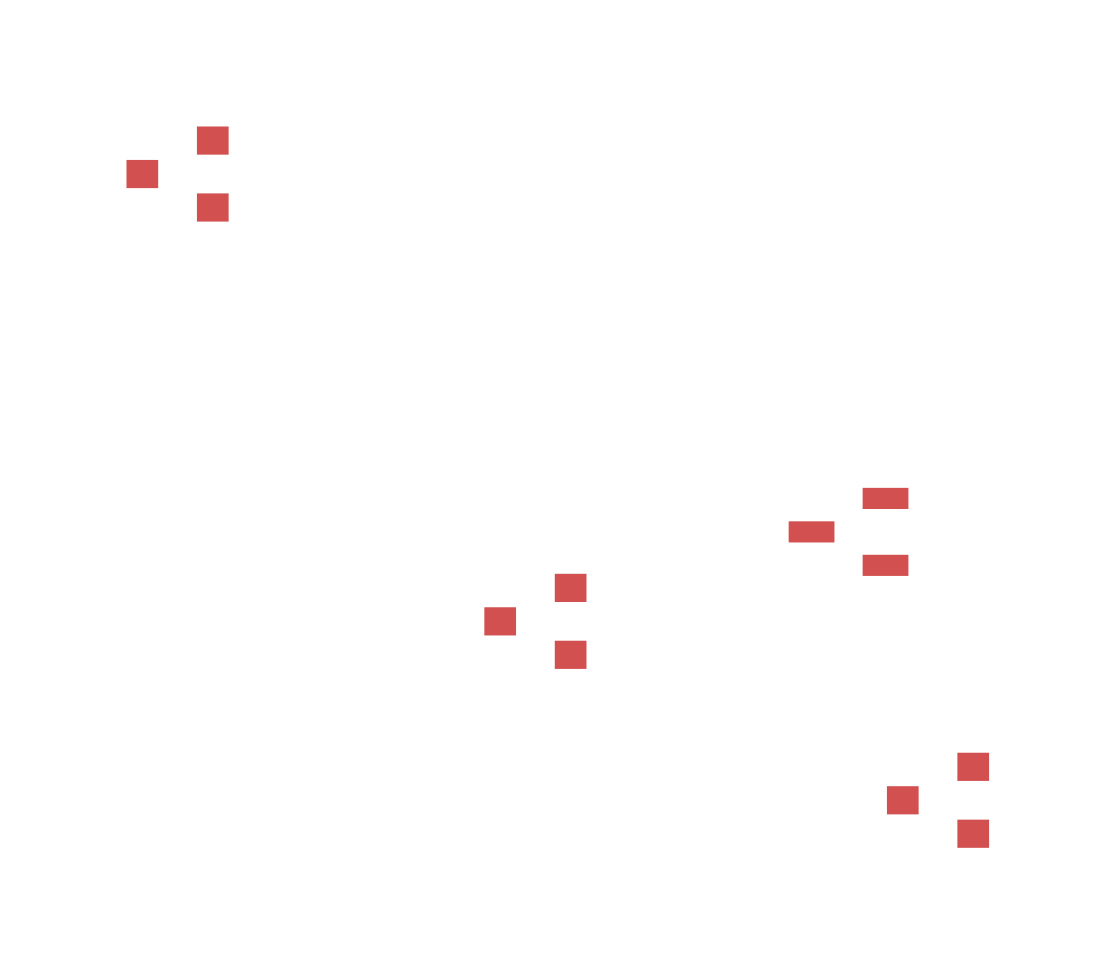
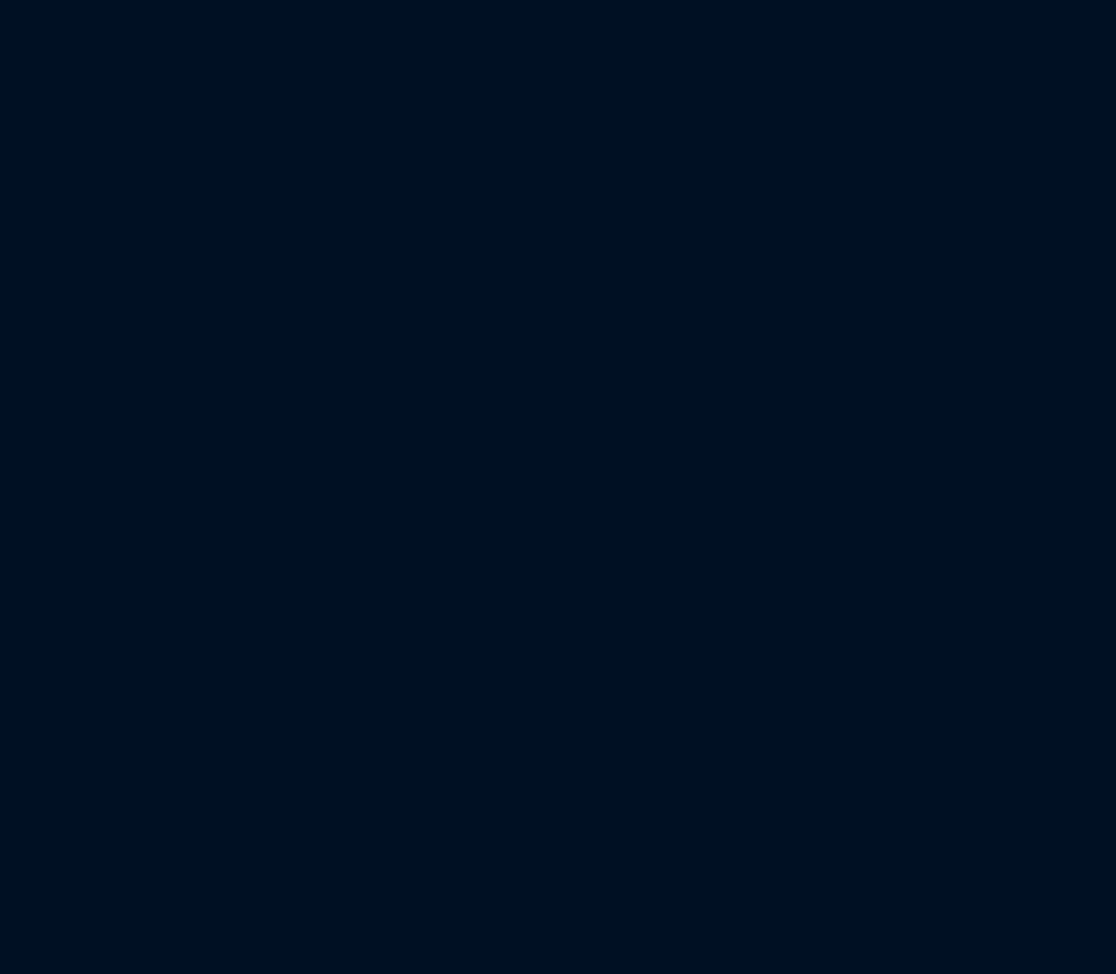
part: (177, 174) -> none
part: (848, 531) -> none
part: (535, 621) -> none
part: (938, 800) -> none

